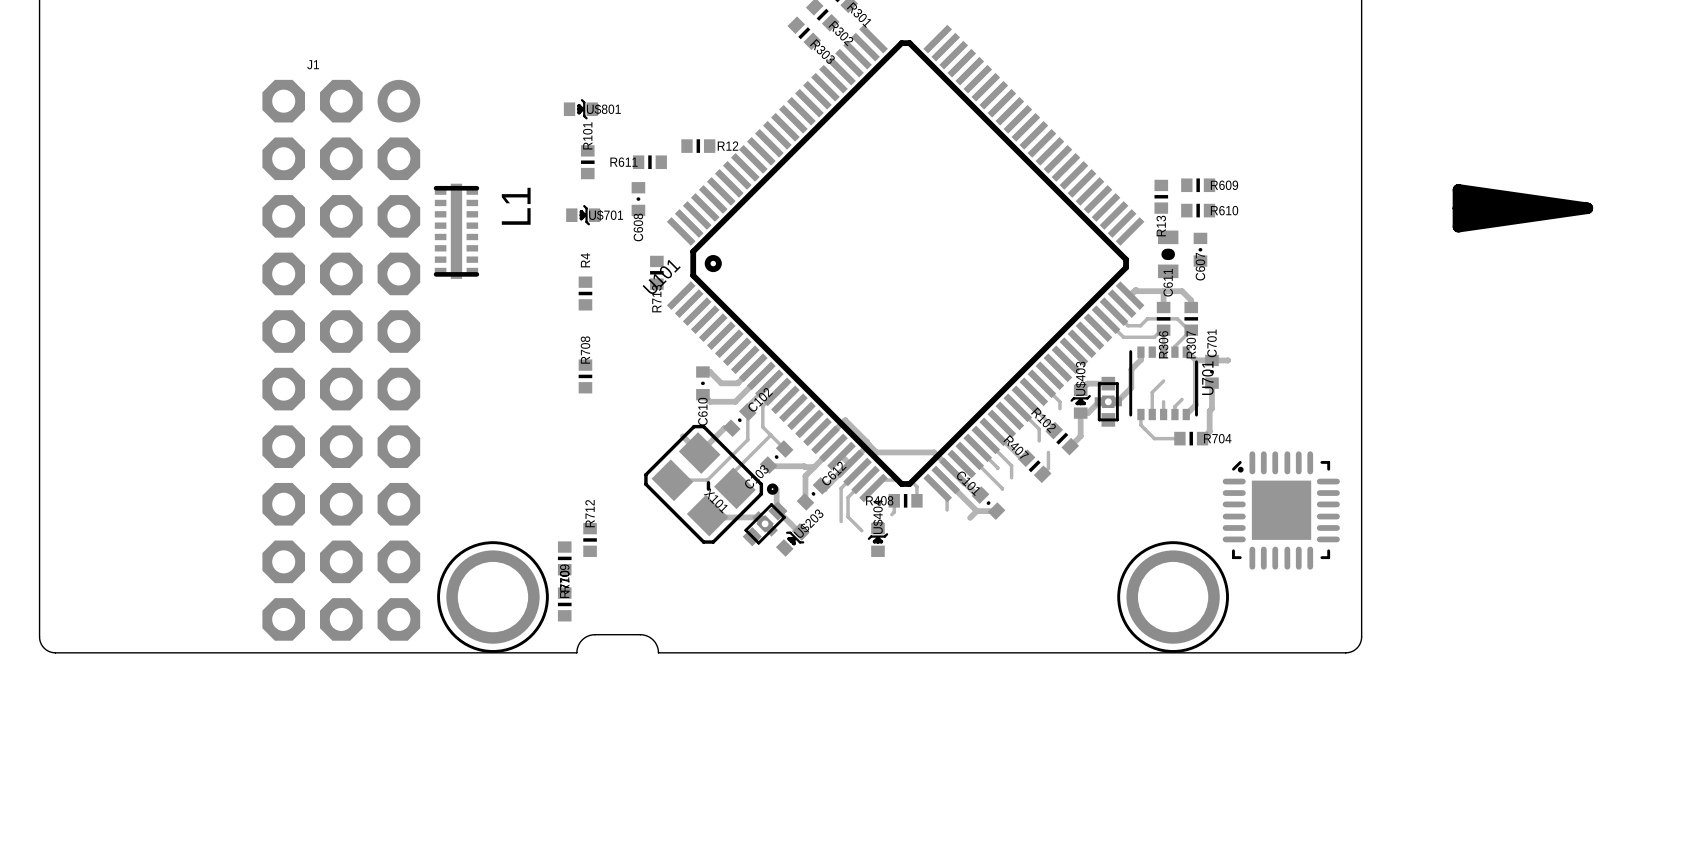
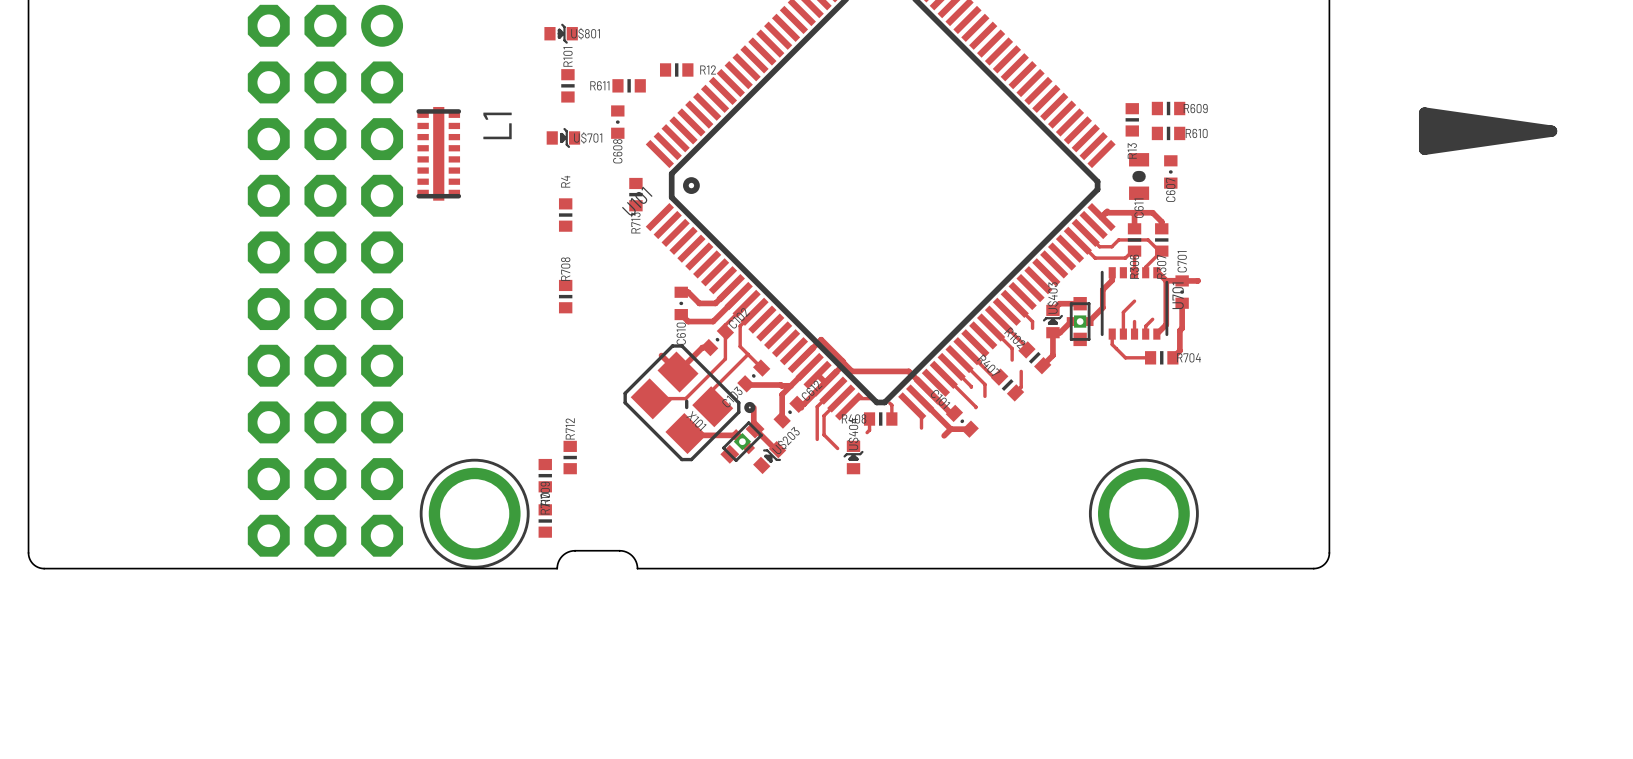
part: (1281, 510) -> none

